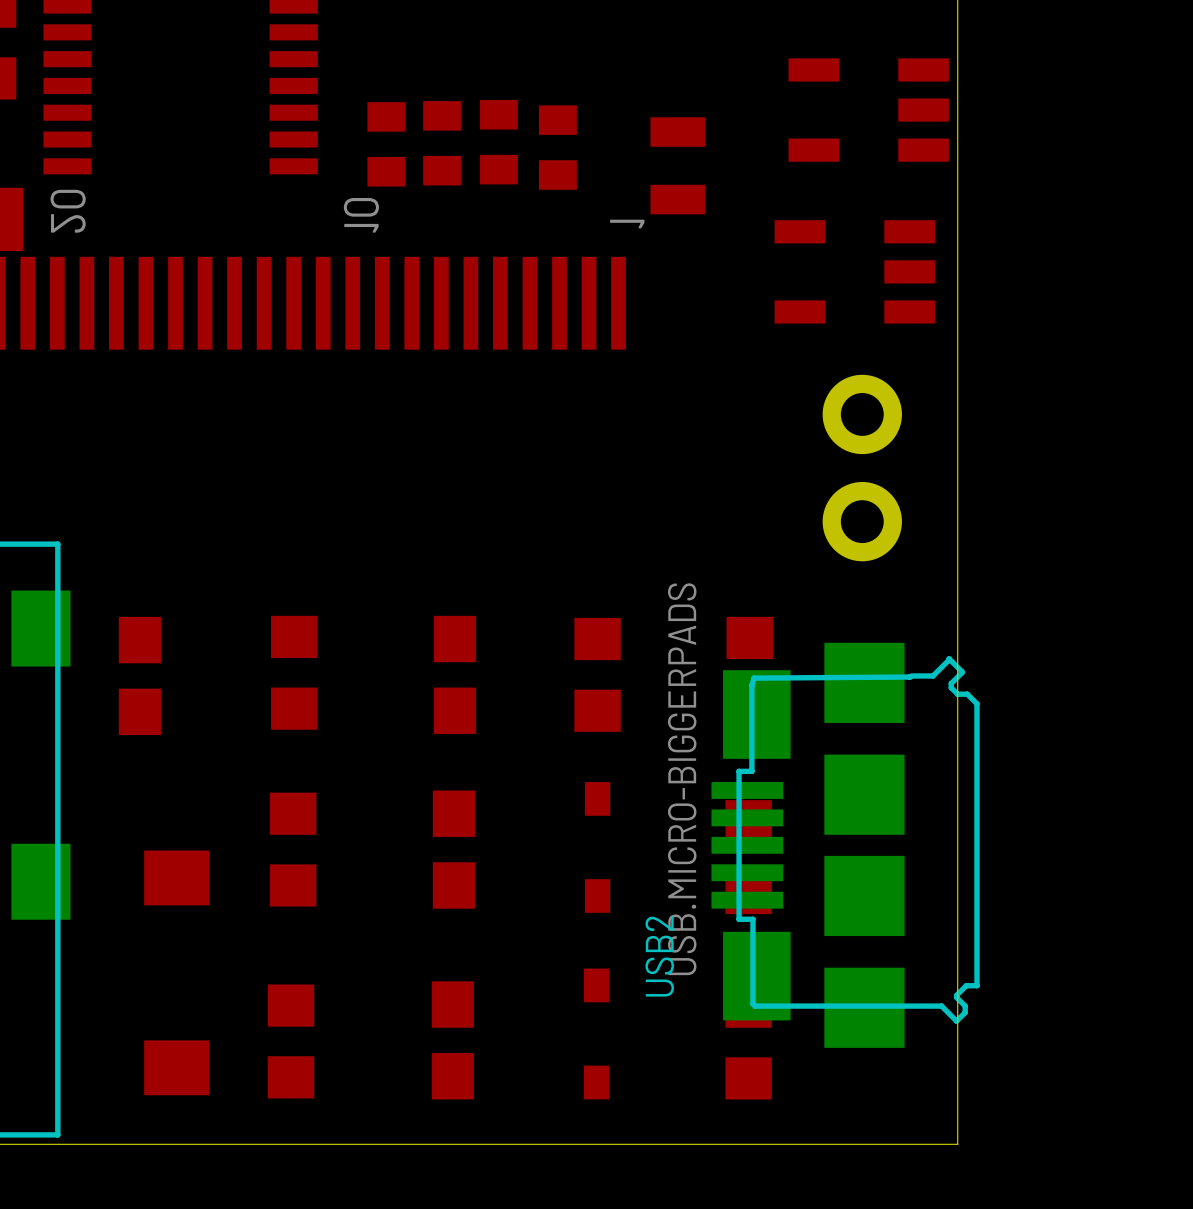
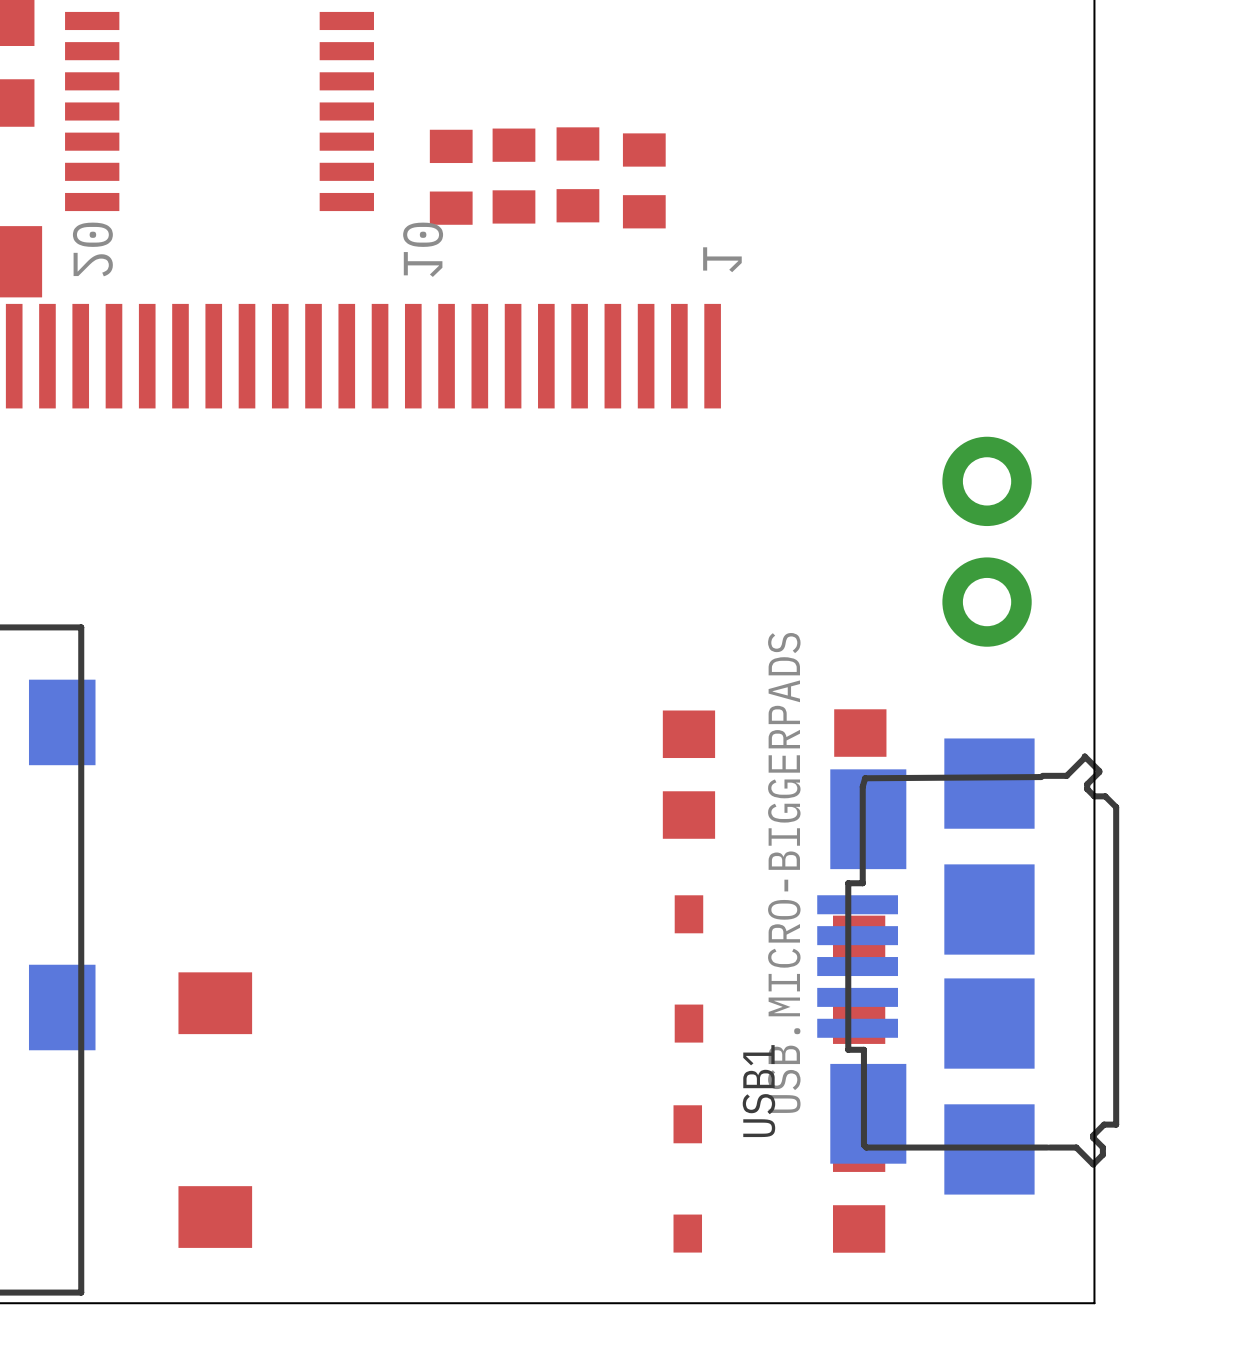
part: (868, 110) -> none
part: (677, 165) -> none
part: (854, 271) -> none
part: (294, 672) -> none
part: (455, 674) -> none
part: (139, 675) -> none
part: (293, 849) -> none
part: (453, 849) -> none
USB2 name: USB2 (659, 956) -> USB1 (758, 1091)
part: (452, 1040) -> none
part: (291, 1041) -> none

